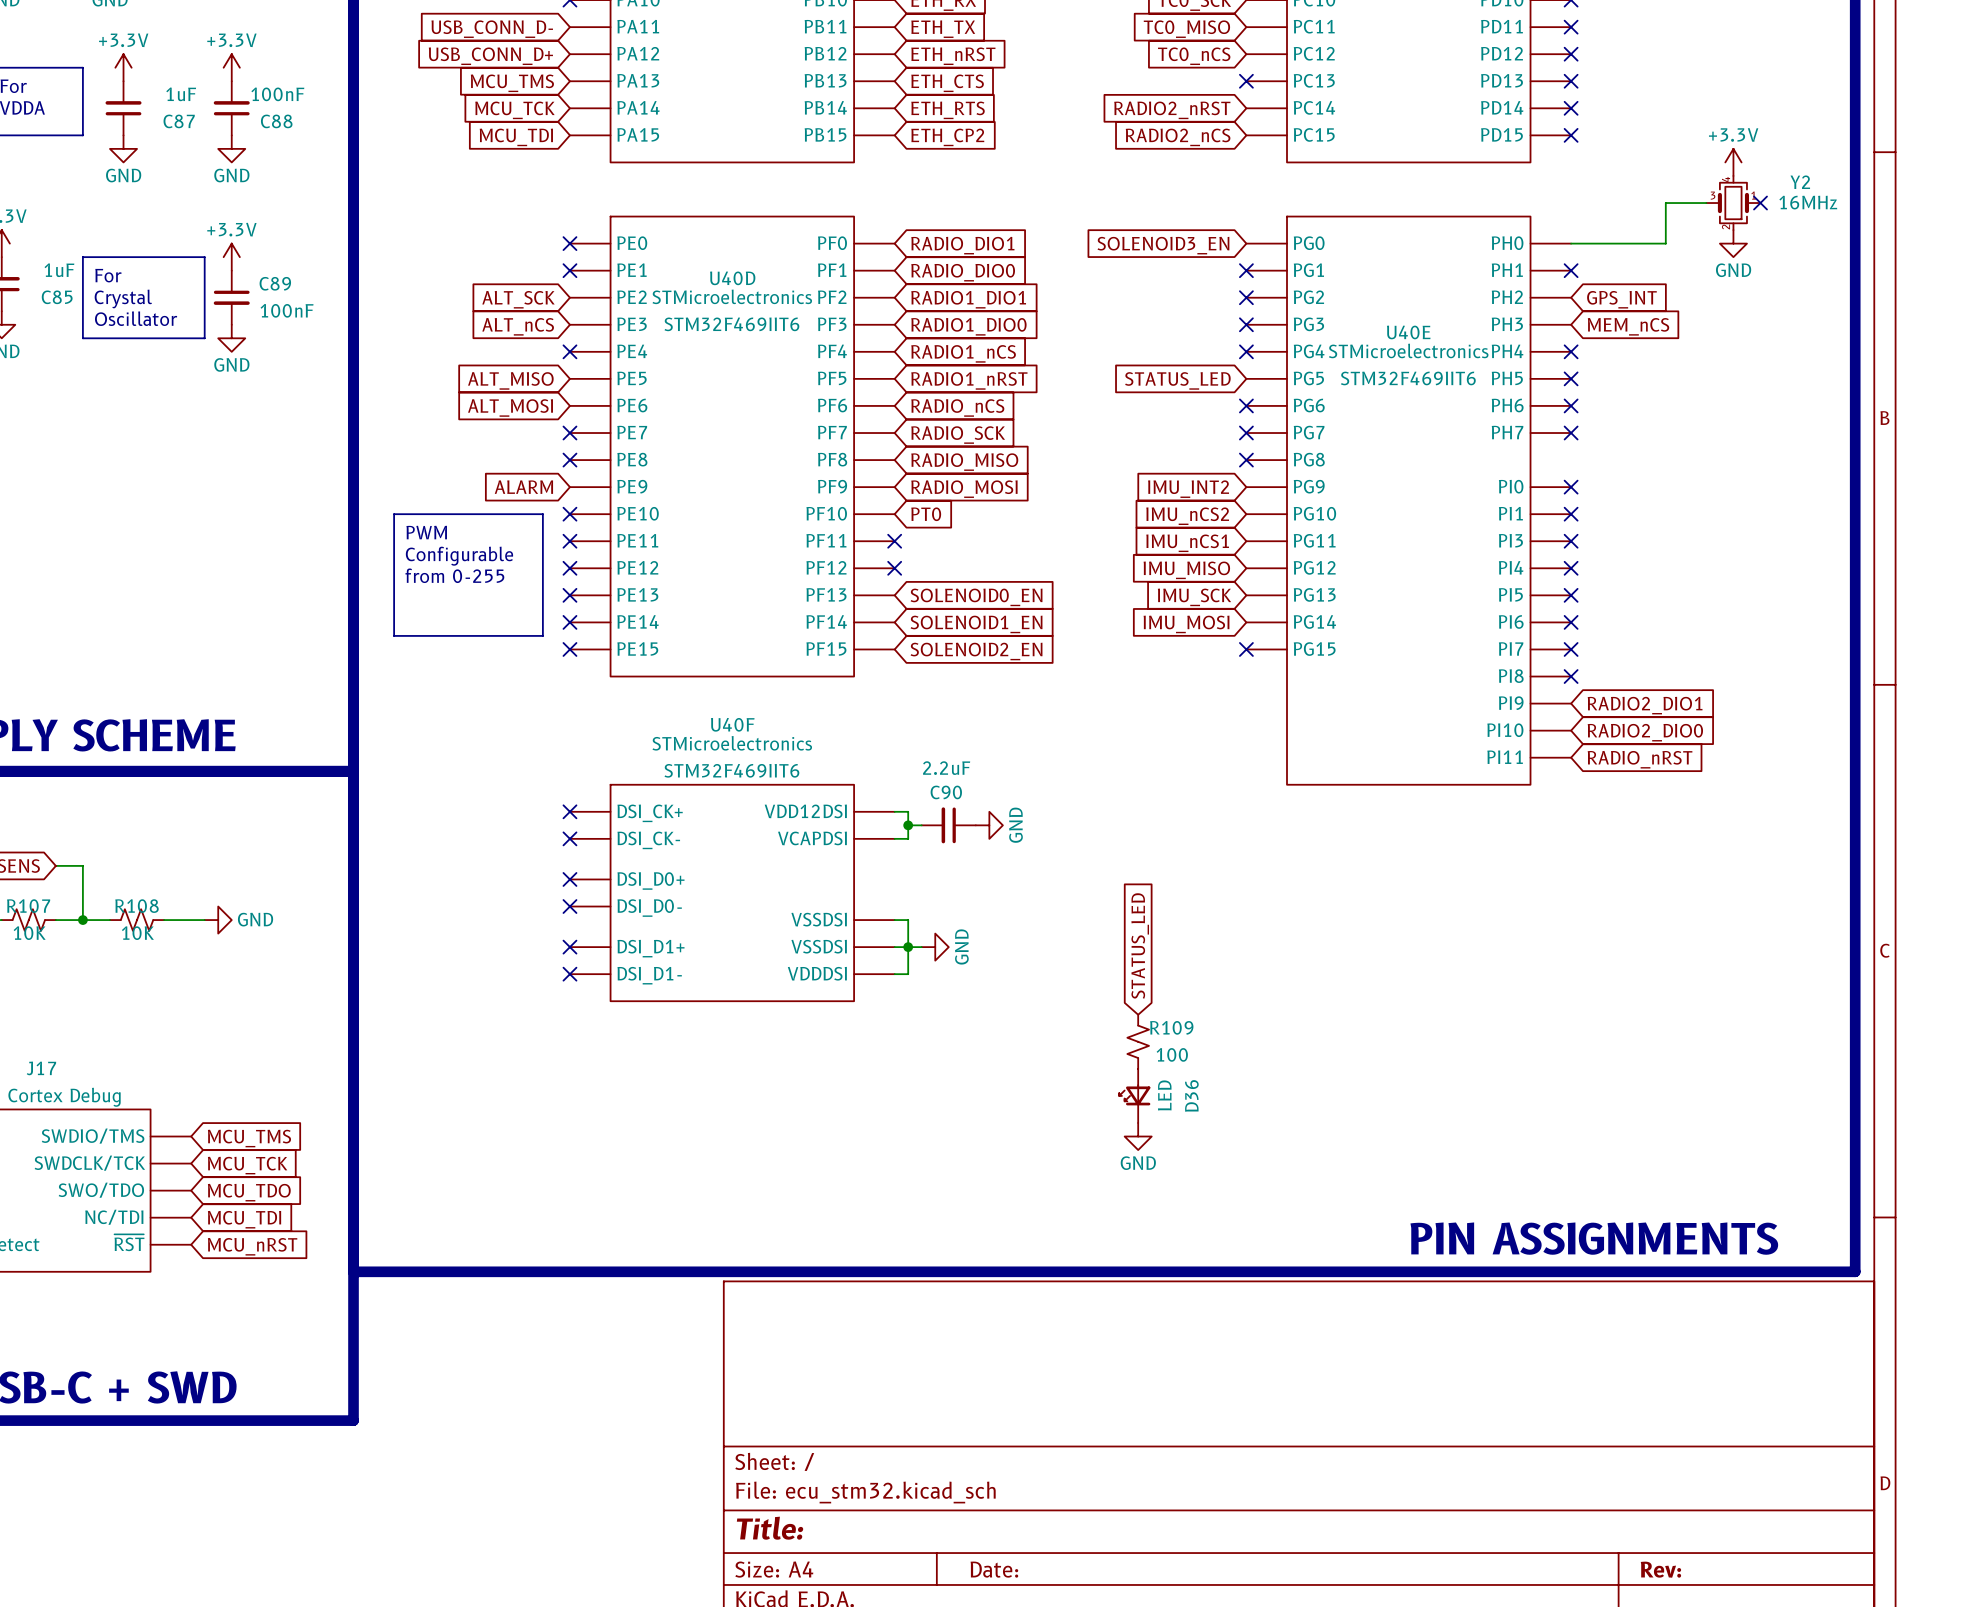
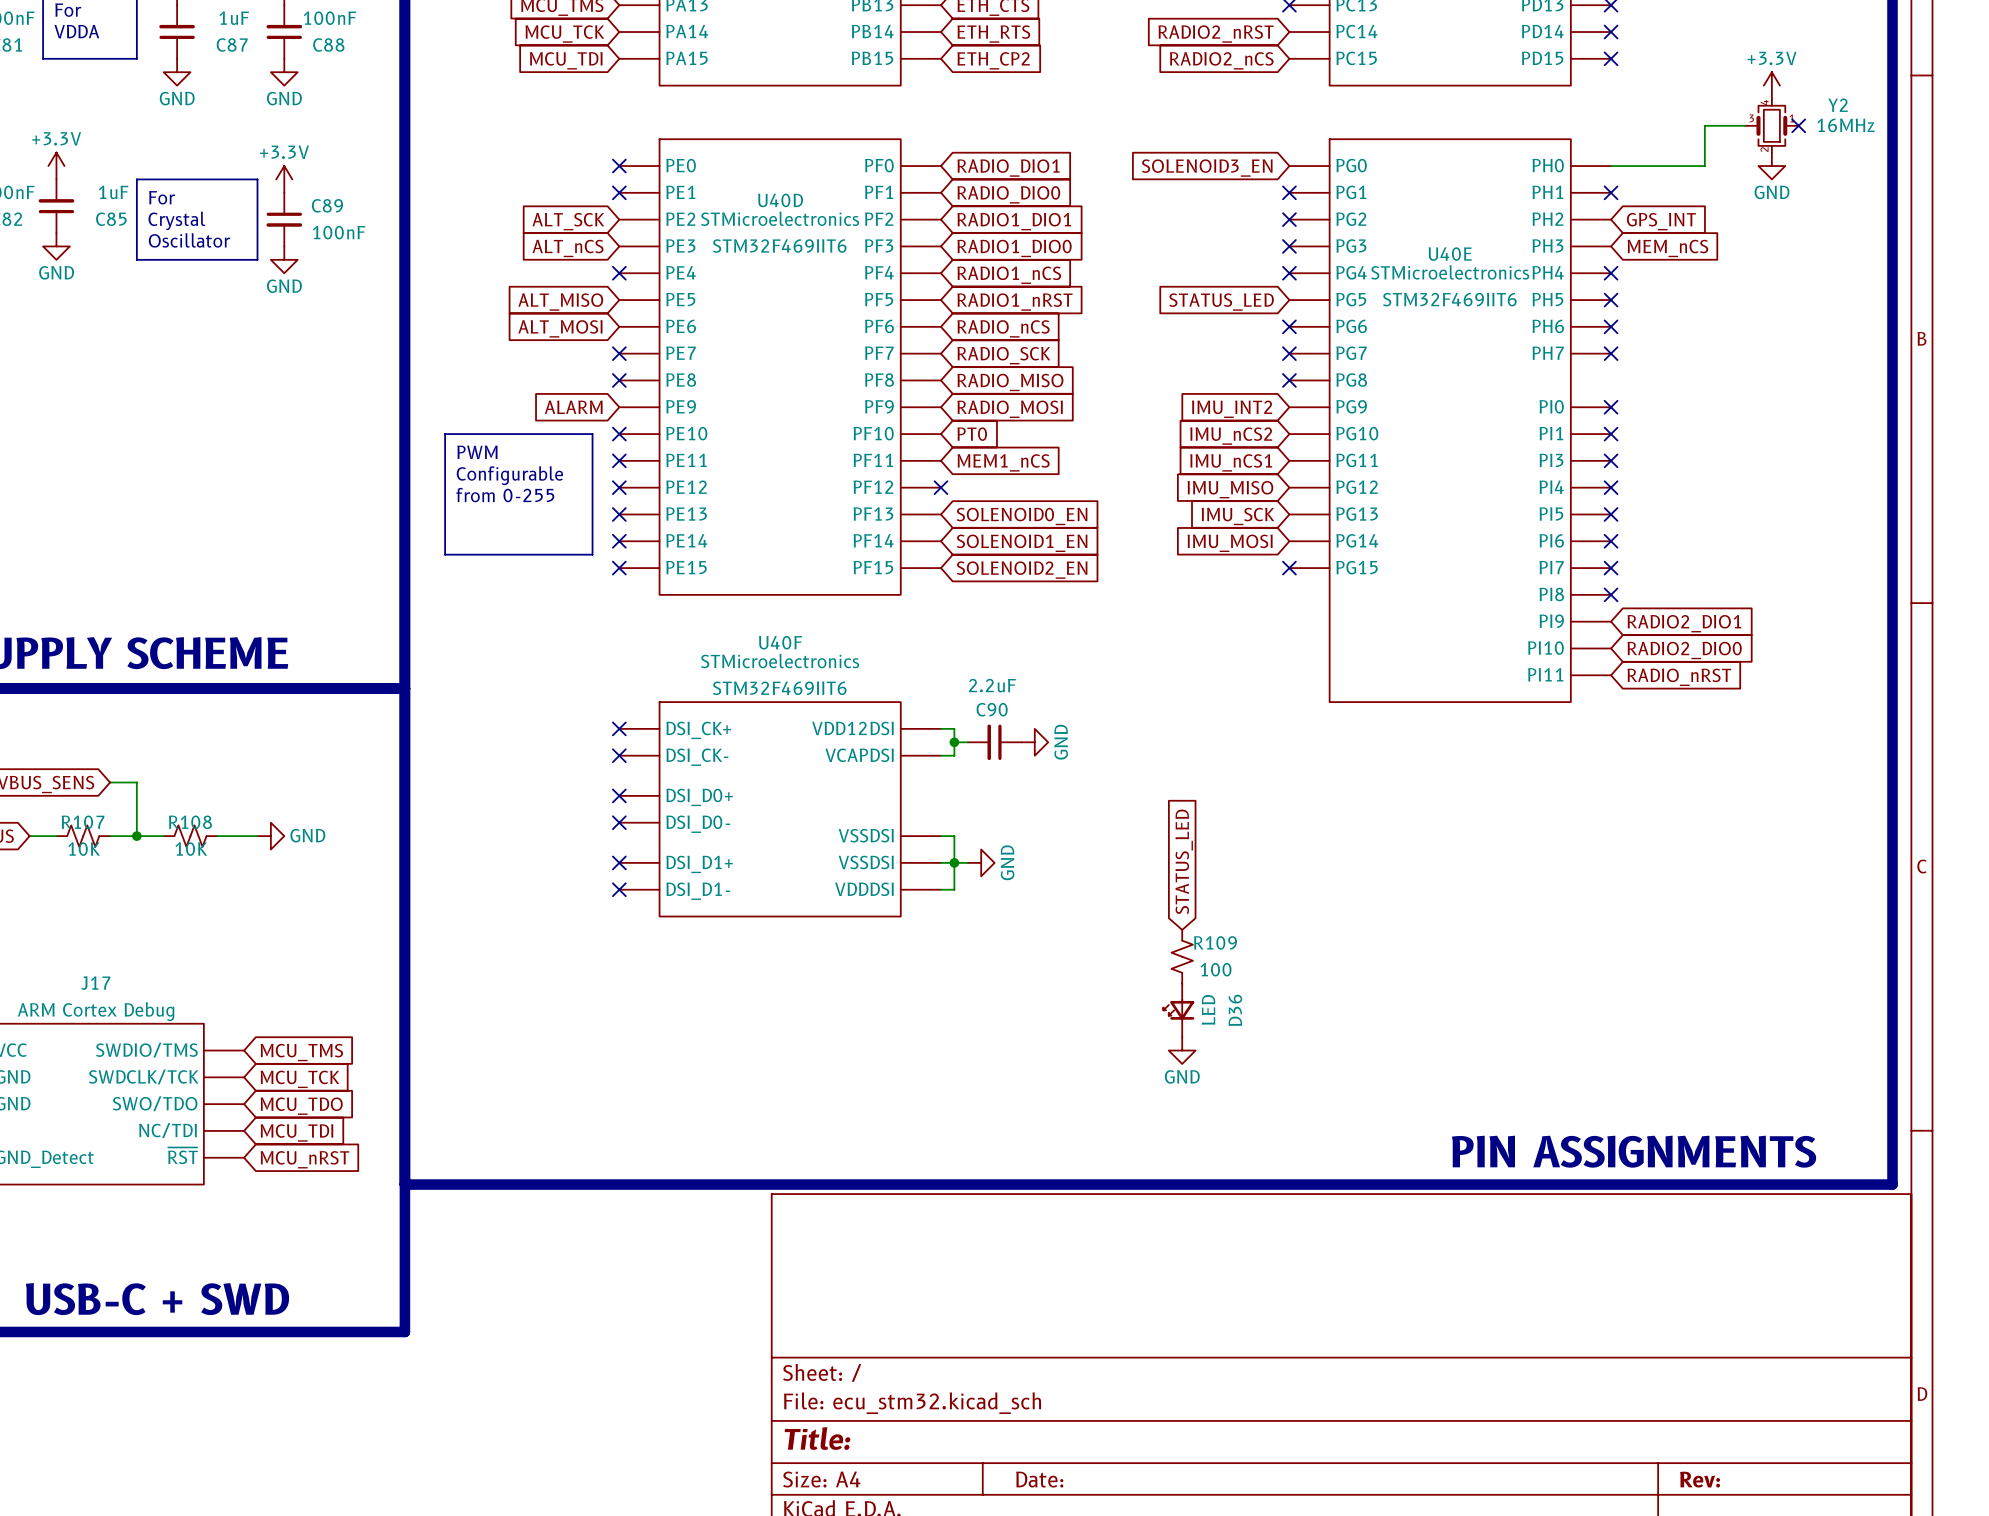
no-connect mark: (894, 541) -> none
global label: none -> MEM1_nCS (1003, 462)

